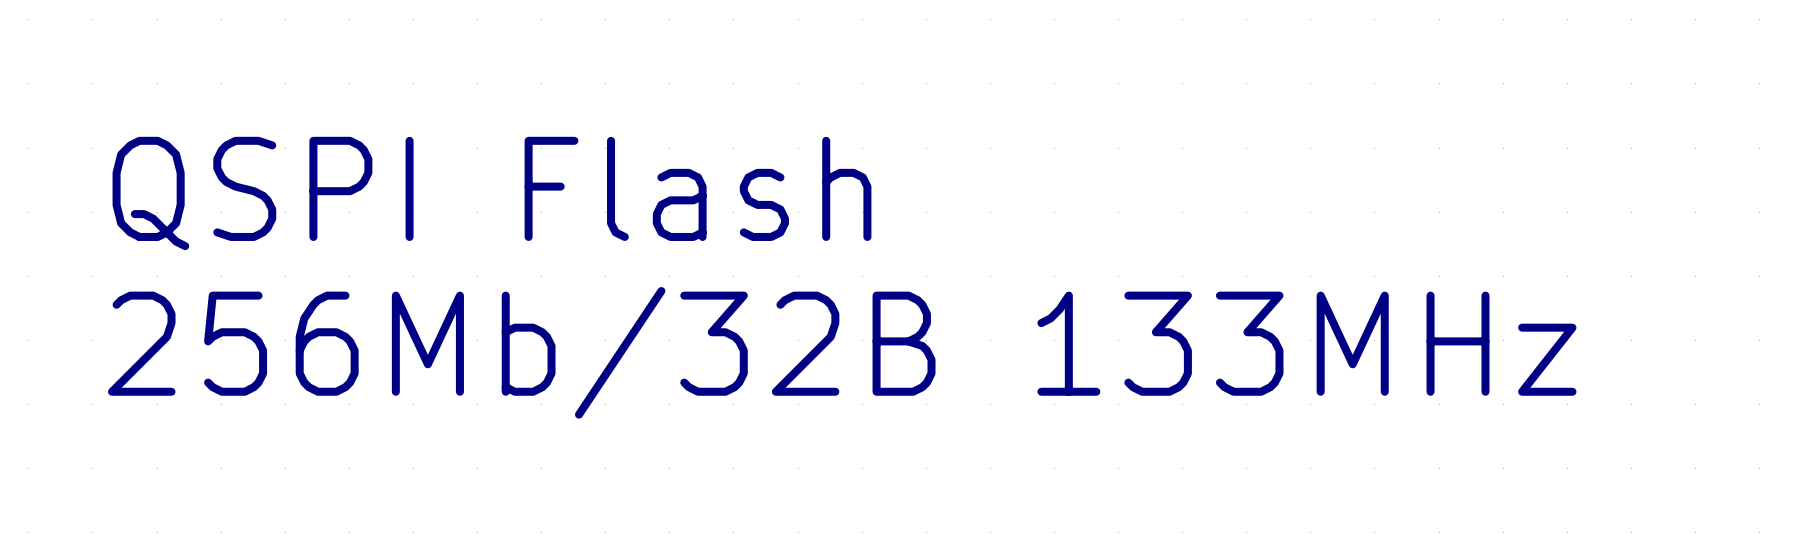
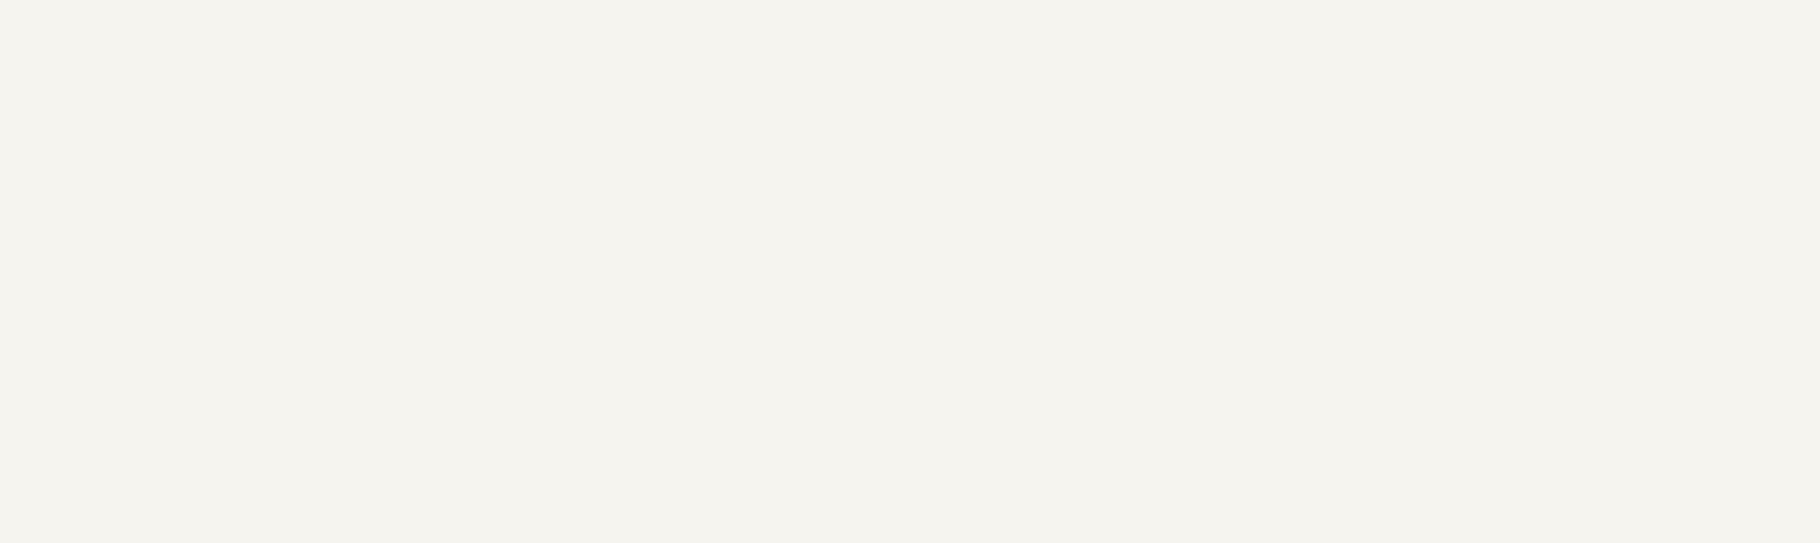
text: QSPI Flash (491, 193) -> none
text: 256Mb/32B 133MHz (842, 352) -> none

